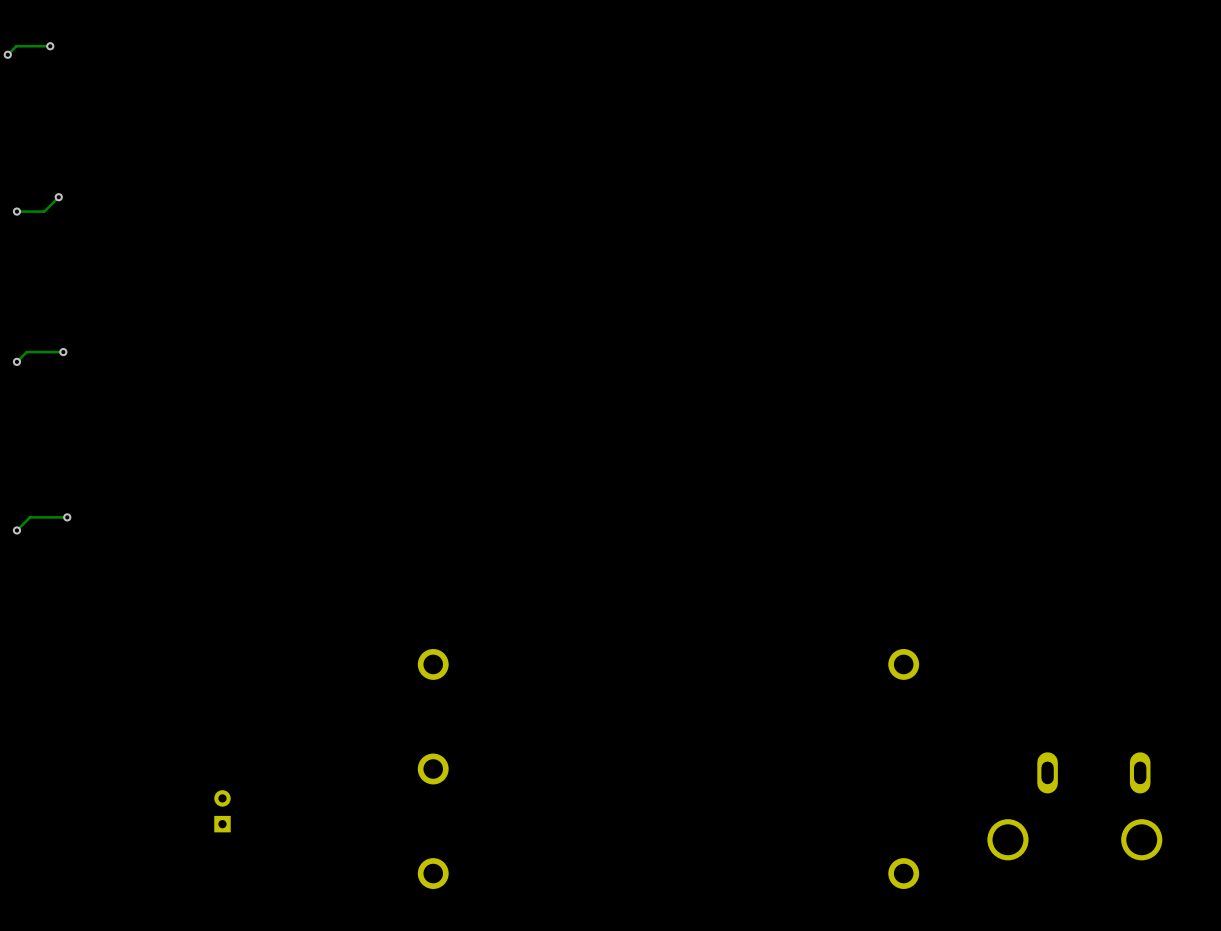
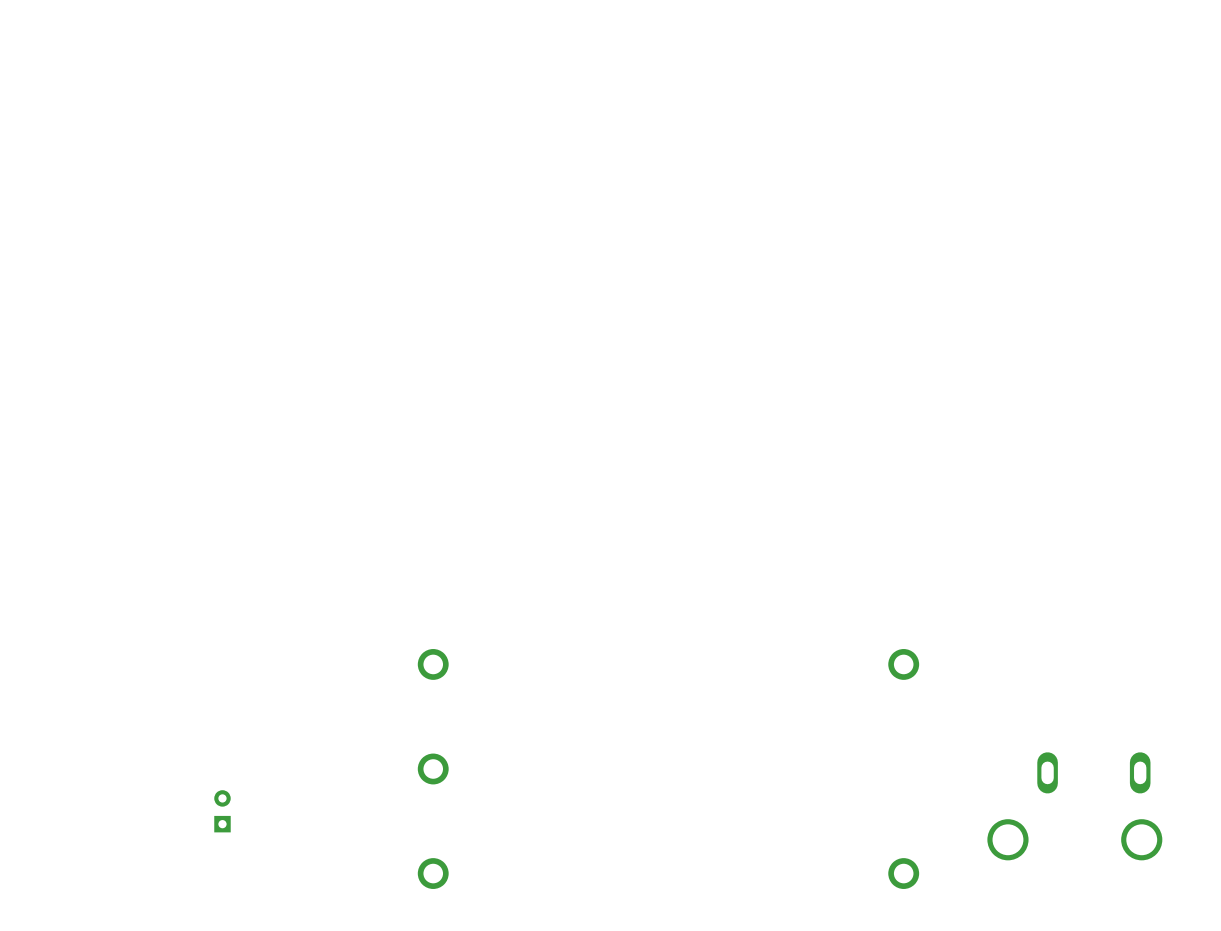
track: (50, 46) (16, 46) (7, 54) -> none
via: (50, 46) -> none
via: (7, 54) -> none
track: (58, 197) (44, 211) (16, 211) -> none
via: (58, 197) -> none
via: (16, 211) -> none
track: (63, 352) (26, 352) (16, 361) -> none
via: (63, 352) -> none
via: (16, 361) -> none
track: (67, 517) (30, 517) (16, 530) -> none
via: (67, 517) -> none
via: (16, 530) -> none

